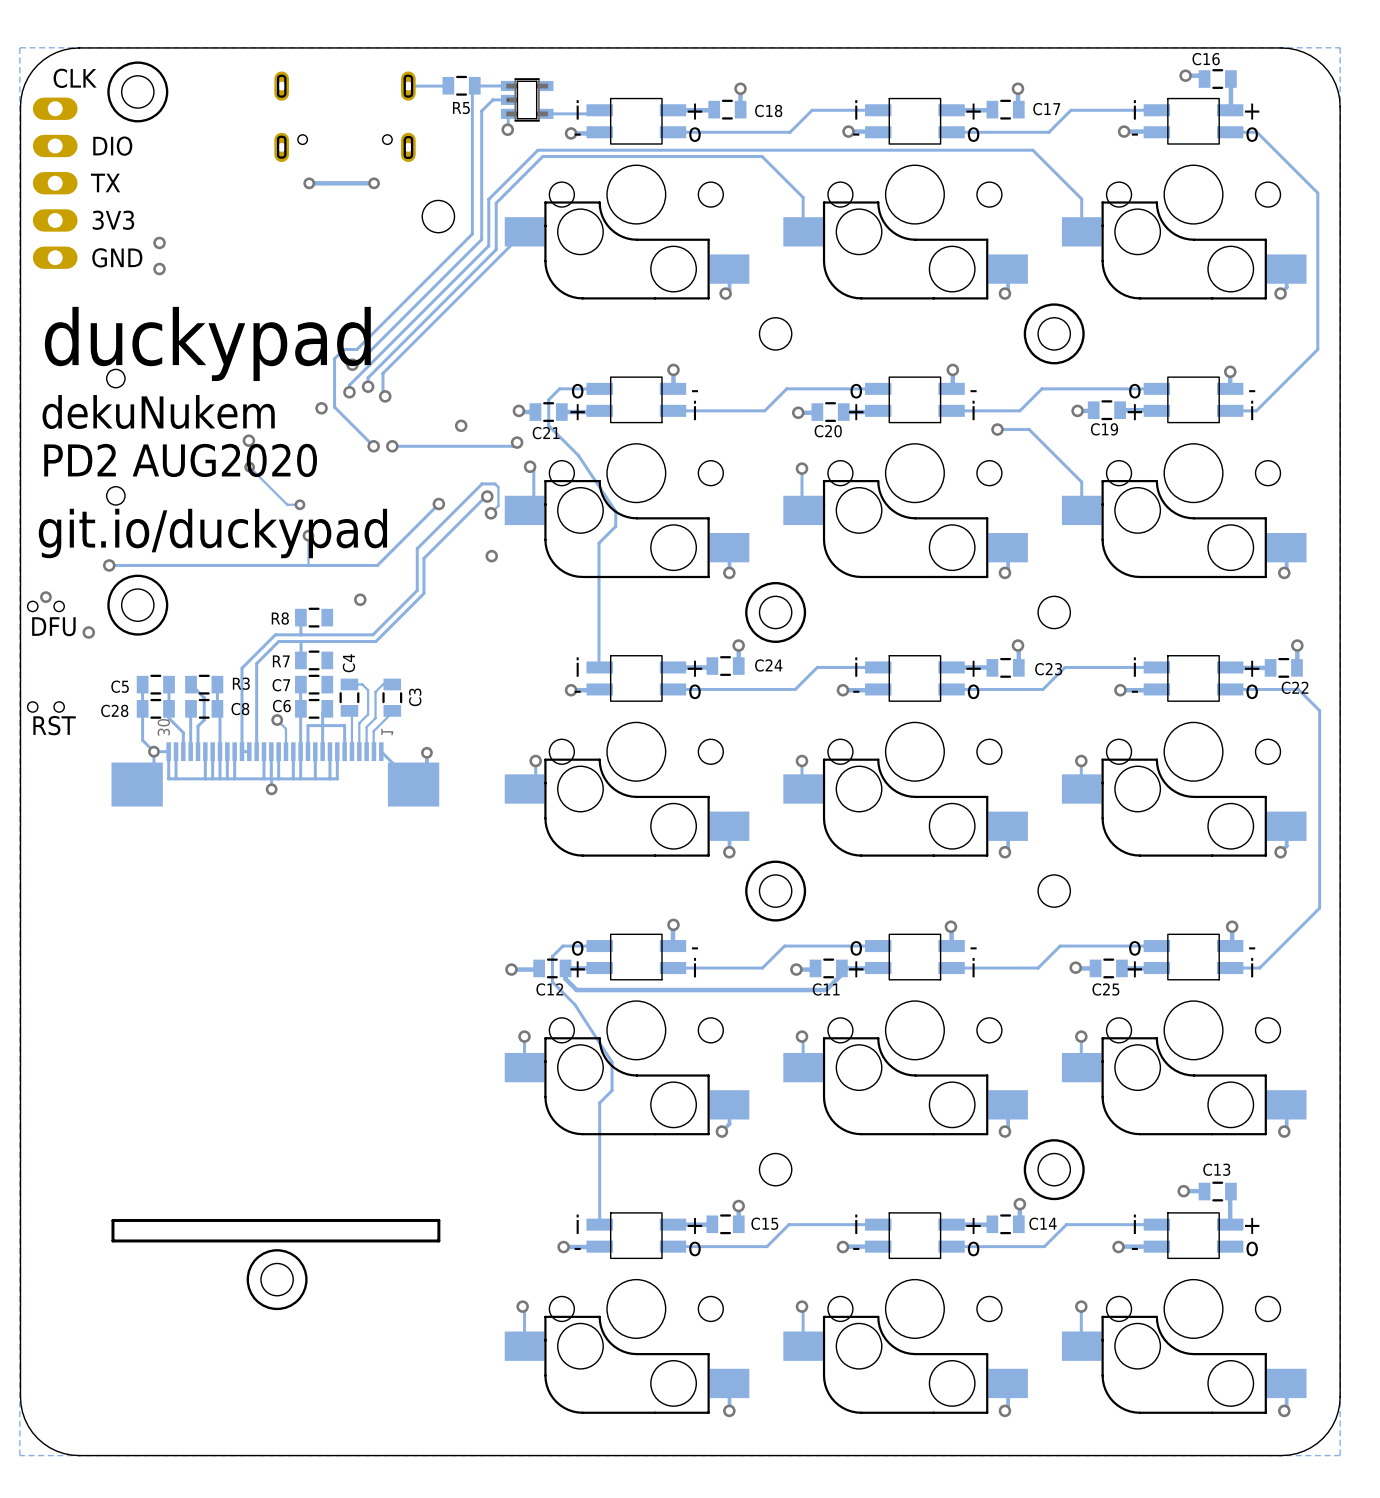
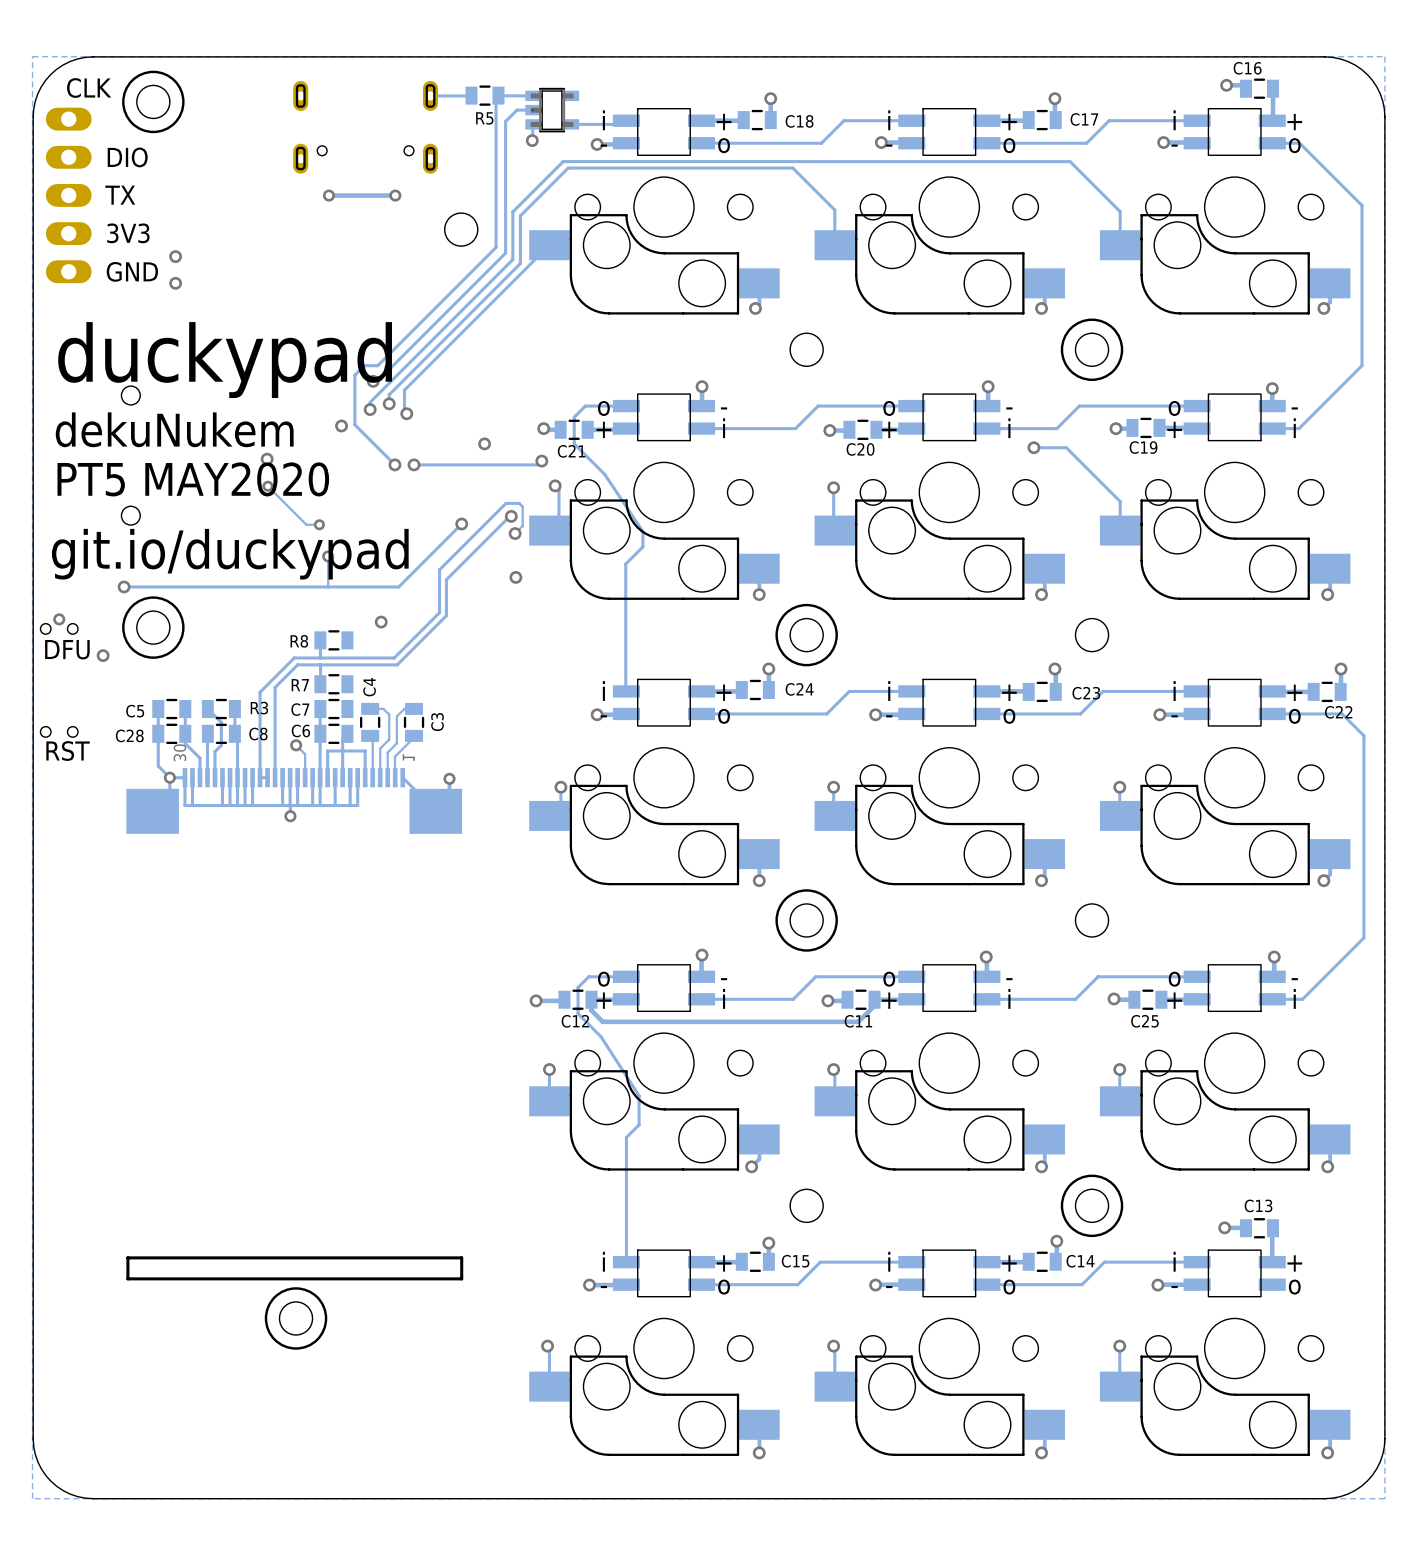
text: PD2 AUG2020 (180, 460) -> PT5 MAY2020 (193, 479)

